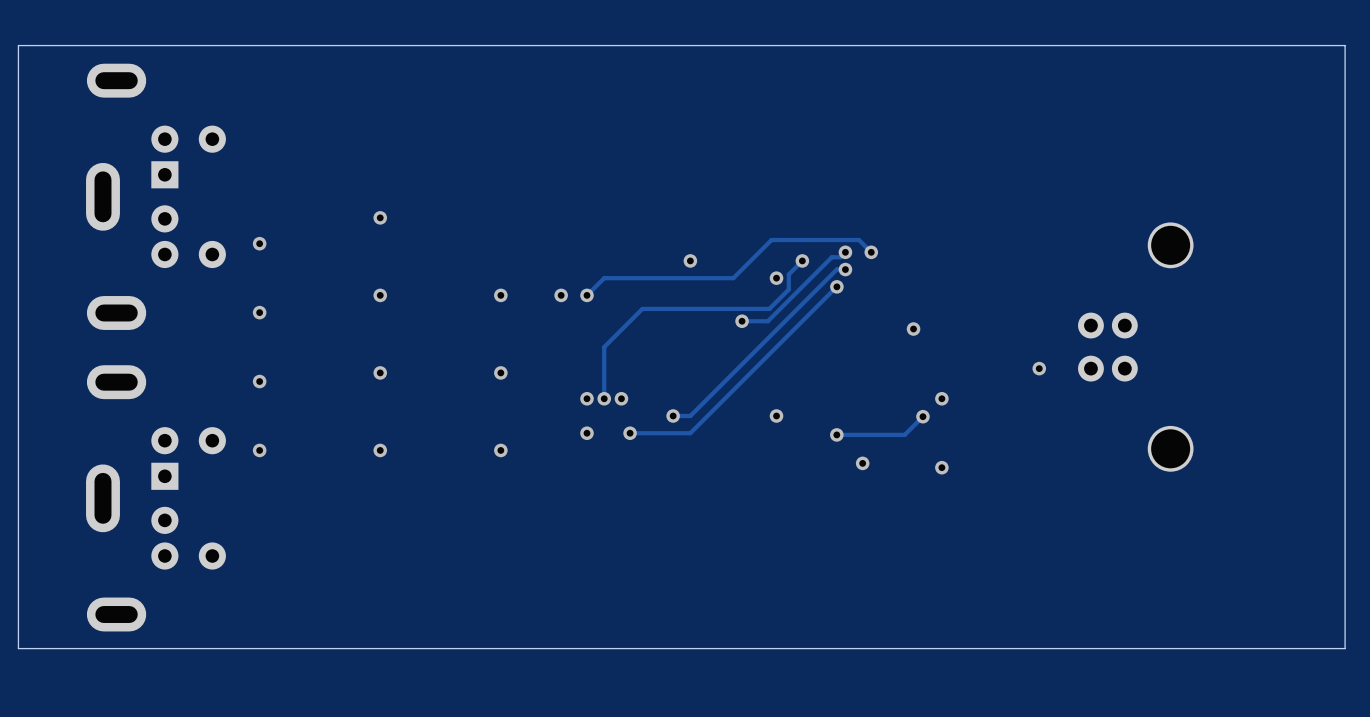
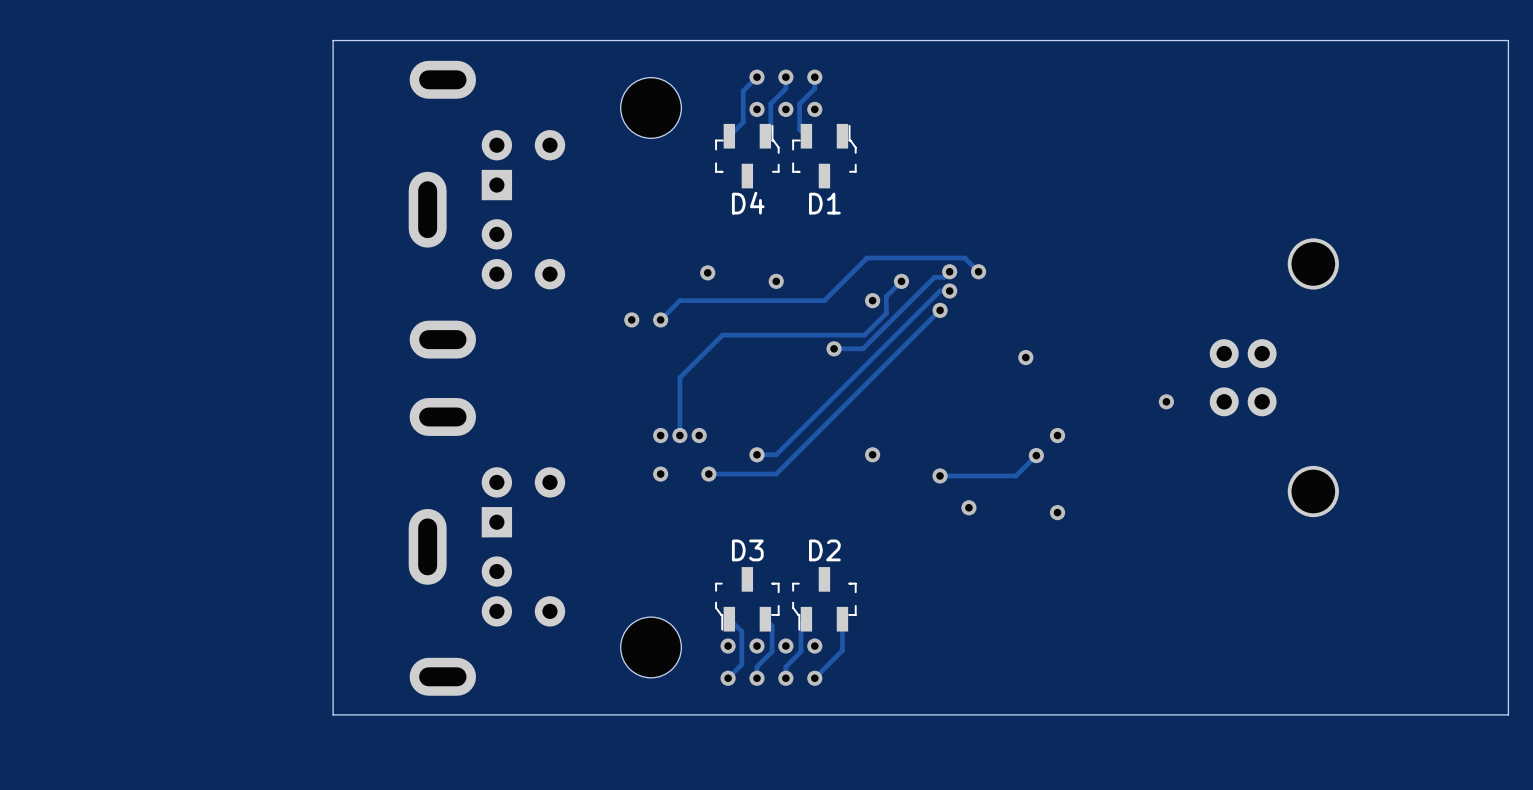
board edge: (294, 45) (18, 45) (18, 648) (294, 648) -> (333, 40) (333, 714)
track: none -> (756, 77) (743, 90) (743, 122) (729, 136)
via: none -> (756, 77)
track: none -> (785, 77) (785, 88) (770, 103) (770, 130) (765, 136)
via: none -> (785, 77)
track: none -> (814, 77) (814, 88) (799, 103) (799, 129) (806, 136)
via: none -> (814, 77)
part: none -> (651, 107)
via: none -> (756, 109)
via: none -> (785, 109)
via: none -> (814, 109)
D4: none -> (747, 156)
D1: none -> (824, 156)
part: (155, 196) -> none
part: none -> (486, 209)
via: (380, 217) -> none
via: (259, 243) -> none
via: none -> (707, 272)
via: (380, 295) -> none
via: (500, 295) -> none
via: (259, 312) -> none
via: (380, 372) -> none
via: (500, 372) -> none
via: (259, 381) -> none
via: (259, 450) -> none
via: (380, 450) -> none
via: (500, 450) -> none
part: (155, 498) -> none
part: none -> (486, 546)
D3: none -> (747, 599)
D2: none -> (824, 599)
track: none -> (729, 619) (741, 631) (741, 664) (728, 678)
track: none -> (765, 619) (772, 625) (772, 651) (756, 666) (756, 678)
track: none -> (806, 619) (801, 624) (801, 651) (785, 666) (785, 678)
track: none -> (842, 619) (842, 650) (814, 678)
via: none -> (728, 646)
via: none -> (756, 646)
via: none -> (785, 646)
via: none -> (814, 646)
part: none -> (651, 647)
via: none -> (728, 678)
via: none -> (756, 678)
via: none -> (785, 678)
via: none -> (814, 678)

